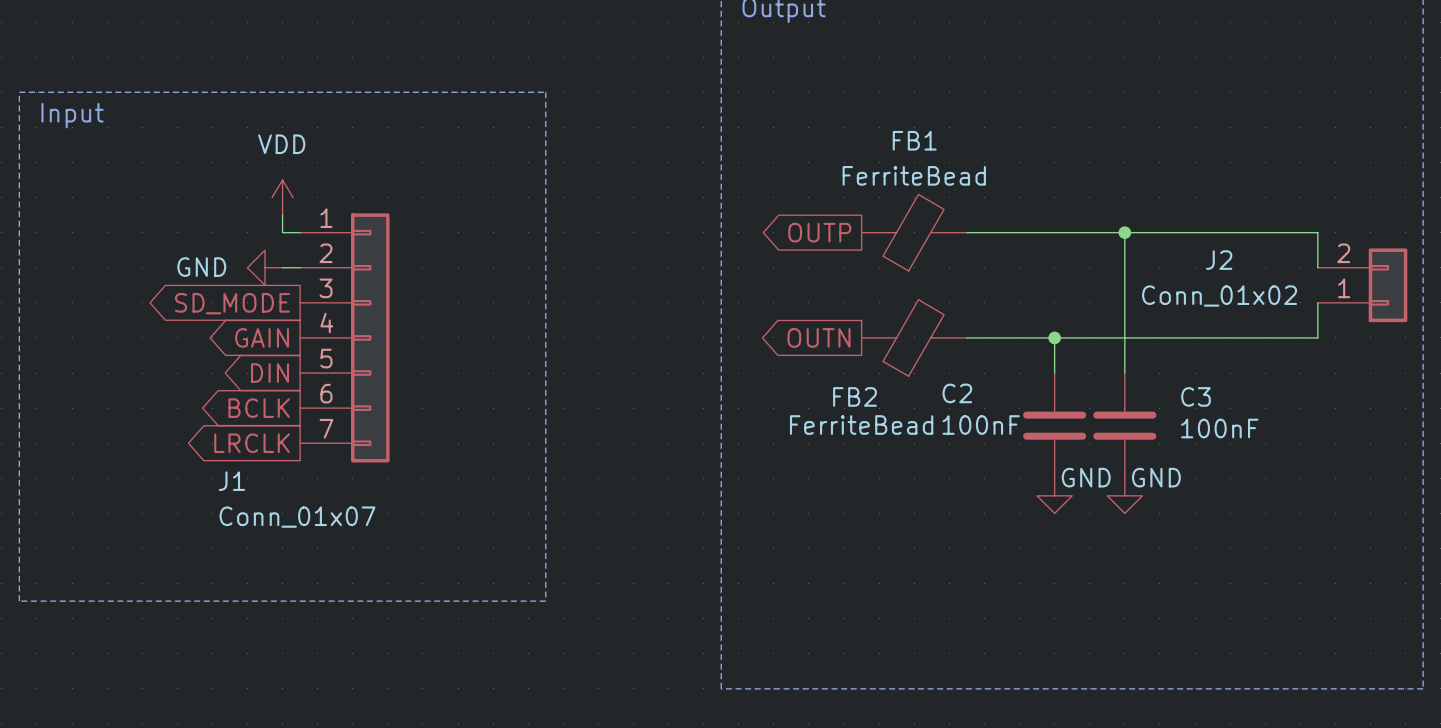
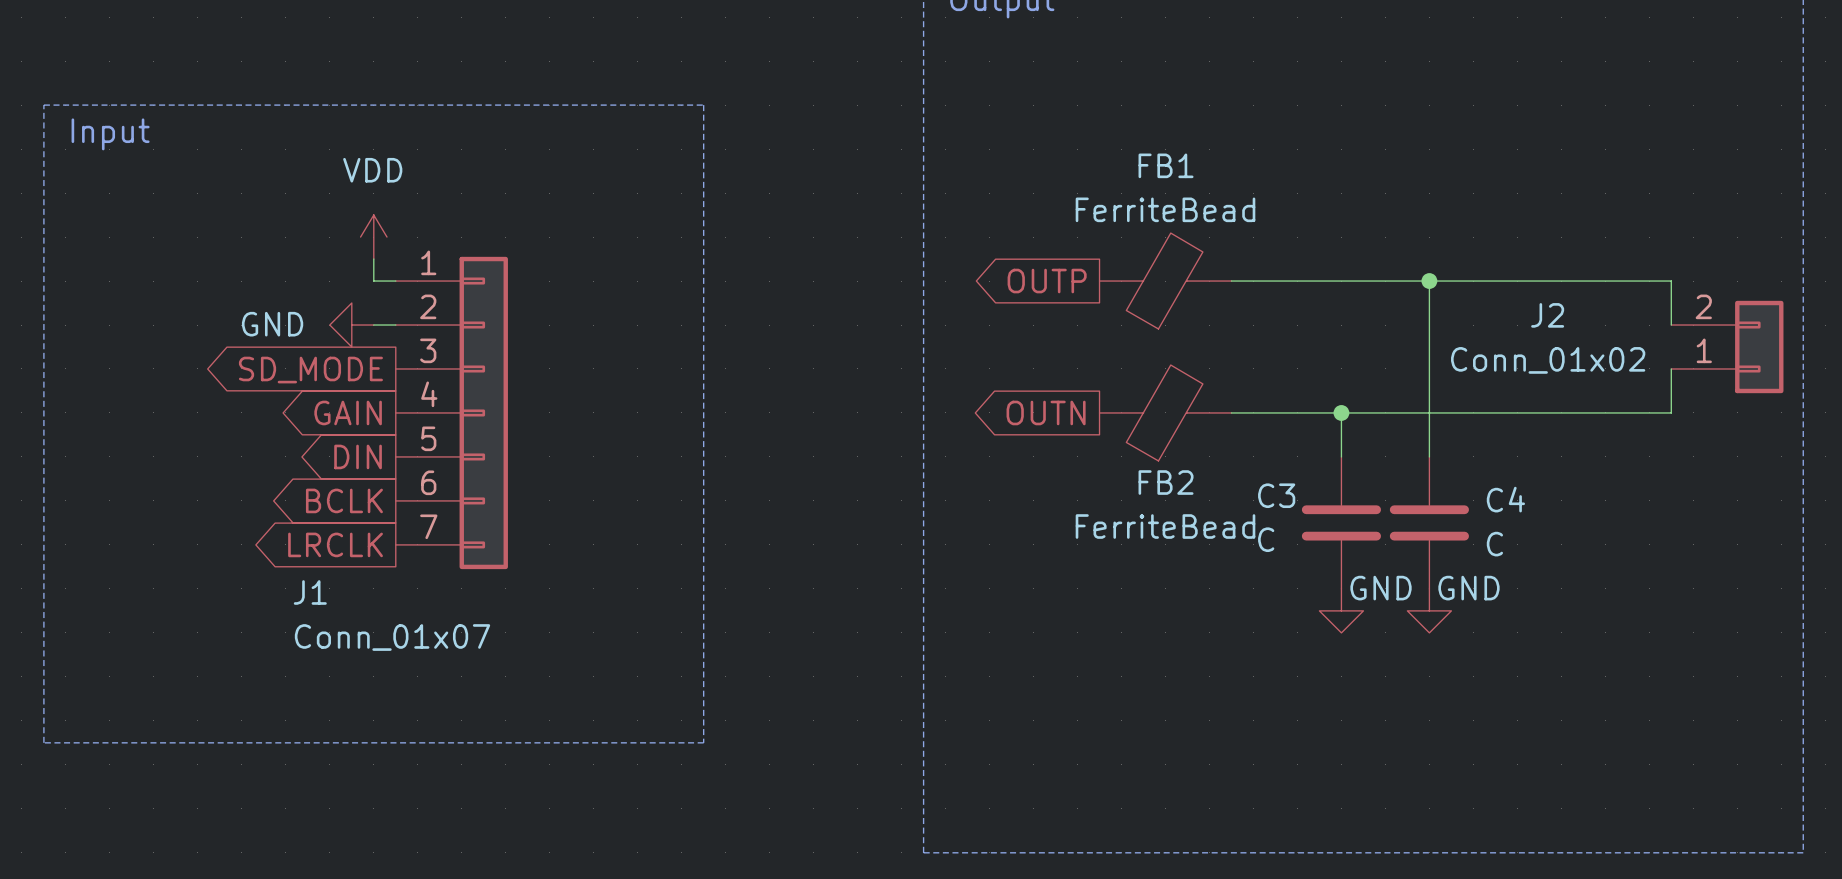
C2 name: C2 (957, 393) -> C3 (1276, 495)
FB2 name position: FB2 (855, 396) -> FB2 (1166, 482)
C3 name: C3 (1195, 396) -> C4 (1505, 499)
FB2 value position: FerriteBead (861, 425) -> FerriteBead (1165, 526)
C2 value: 100nF (981, 425) -> C (1266, 539)
C3 value: 100nF (1219, 428) -> C (1494, 544)

